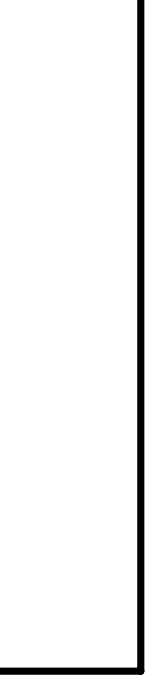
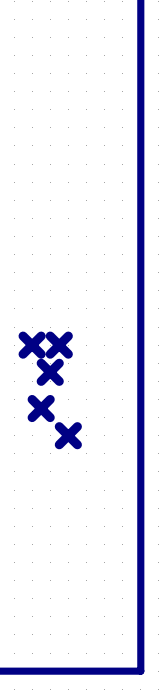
line: none -> (23, 336) (41, 354)
line: none -> (41, 336) (23, 354)
line: none -> (50, 336) (68, 354)
line: none -> (68, 336) (50, 354)
line: none -> (41, 363) (59, 381)
line: none -> (59, 363) (41, 381)
line: none -> (32, 399) (50, 417)
line: none -> (50, 399) (32, 417)
line: none -> (59, 426) (77, 444)
line: none -> (77, 426) (59, 444)

